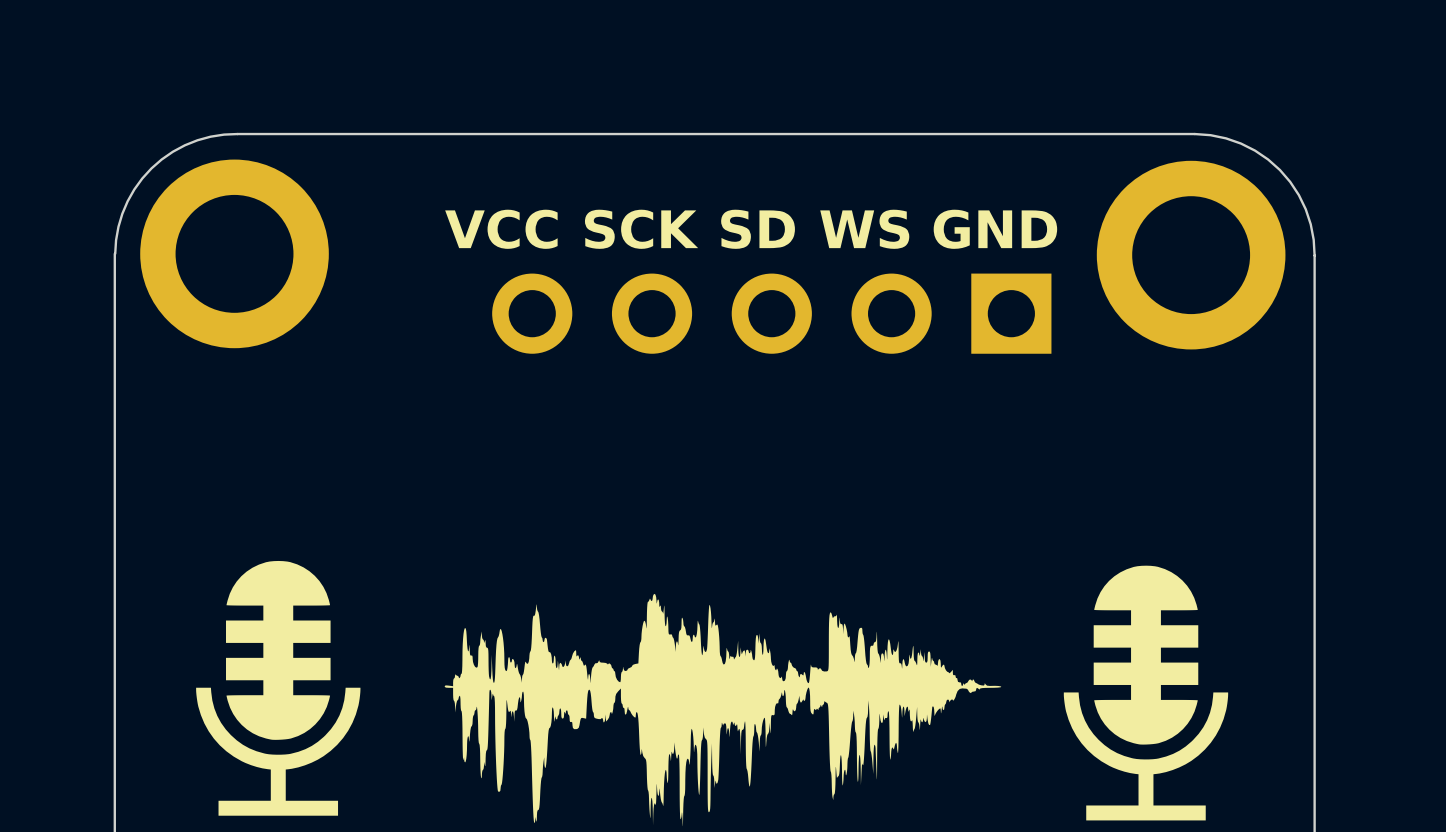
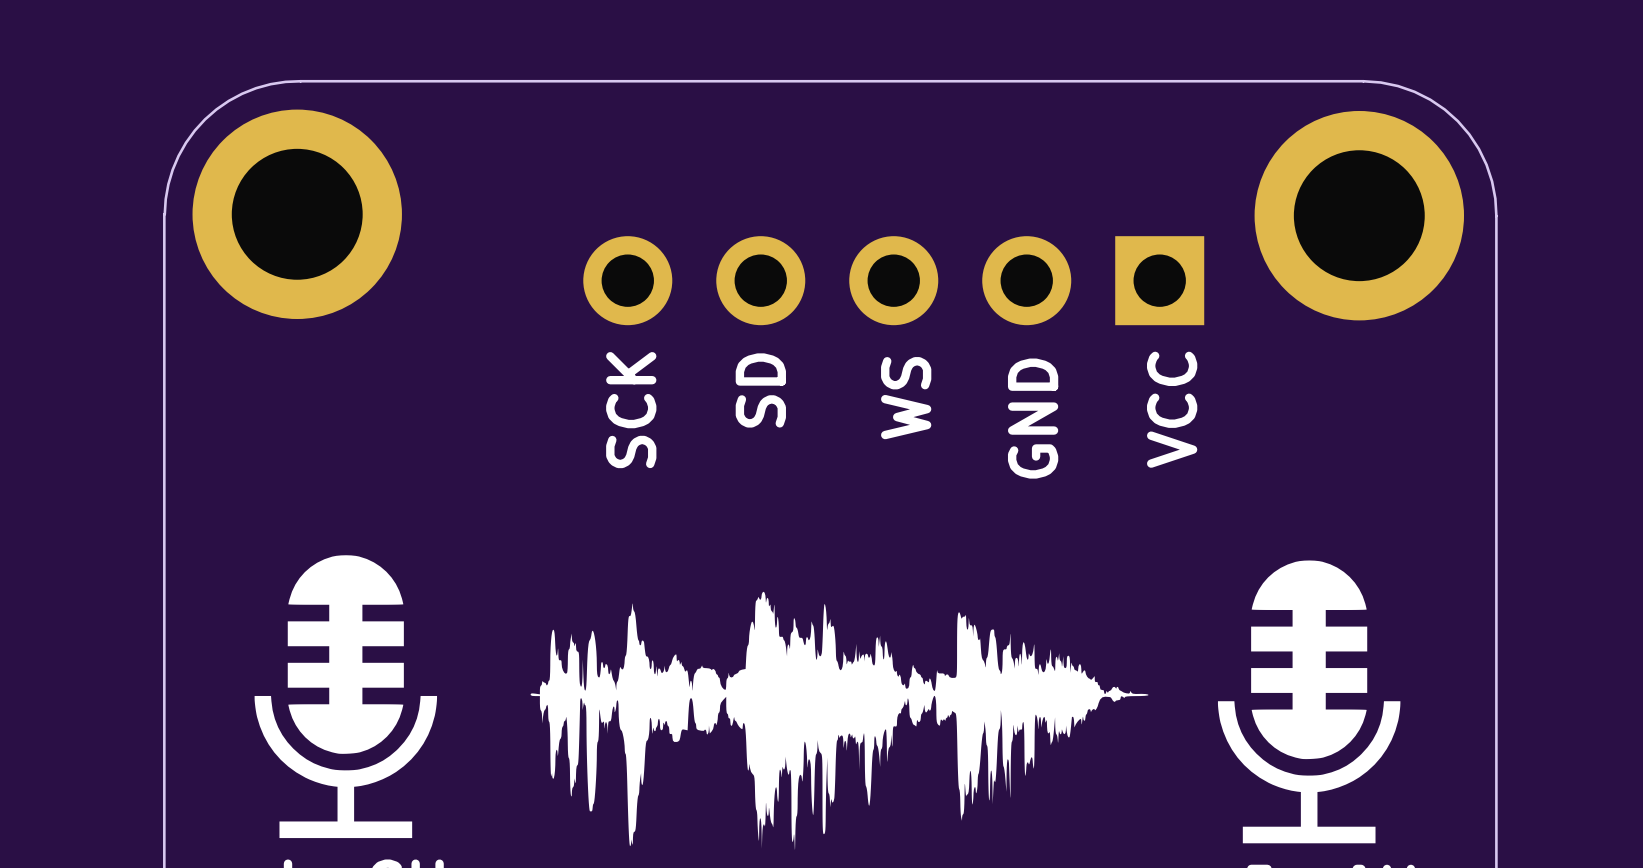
text rotation: 0° (501, 229) -> 90° counterclockwise (1172, 409)
text position: VCC (501, 229) -> VCC (1172, 409)
text rotation: 0° (641, 229) -> 90° counterclockwise (631, 410)
text position: SCK (641, 229) -> SCK (631, 410)
text rotation: 0° (758, 229) -> 90° counterclockwise (760, 390)
text position: SD (758, 229) -> SD (760, 390)
text rotation: 0° (864, 229) -> 90° counterclockwise (906, 398)
text position: WS (864, 229) -> WS (906, 398)
text rotation: 0° (995, 229) -> 90° counterclockwise (1033, 418)
text position: GND (995, 229) -> GND (1033, 418)

